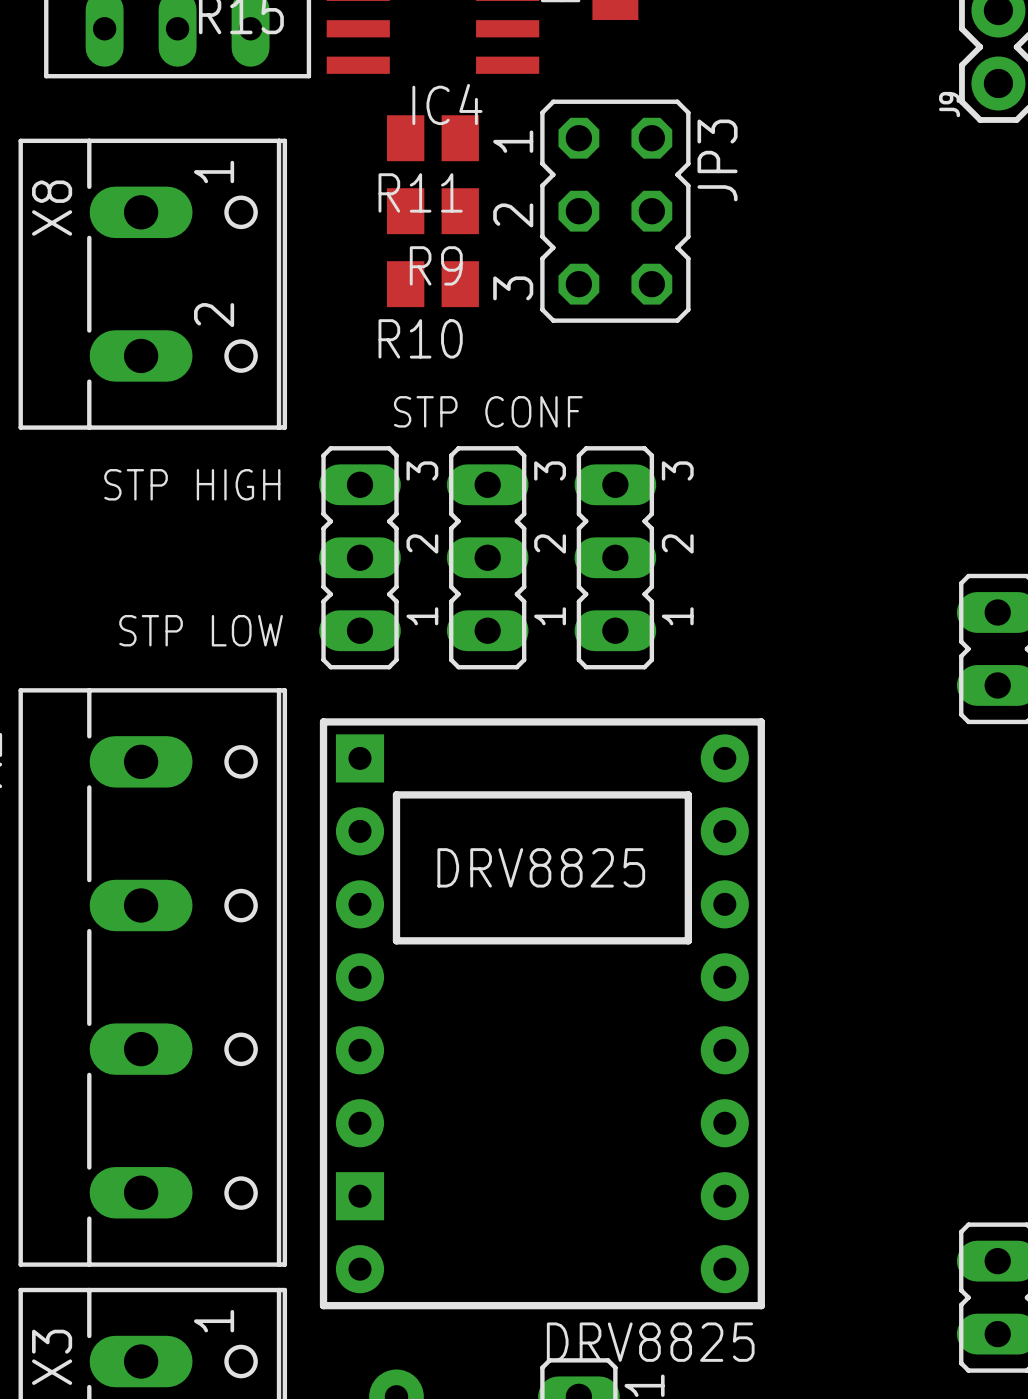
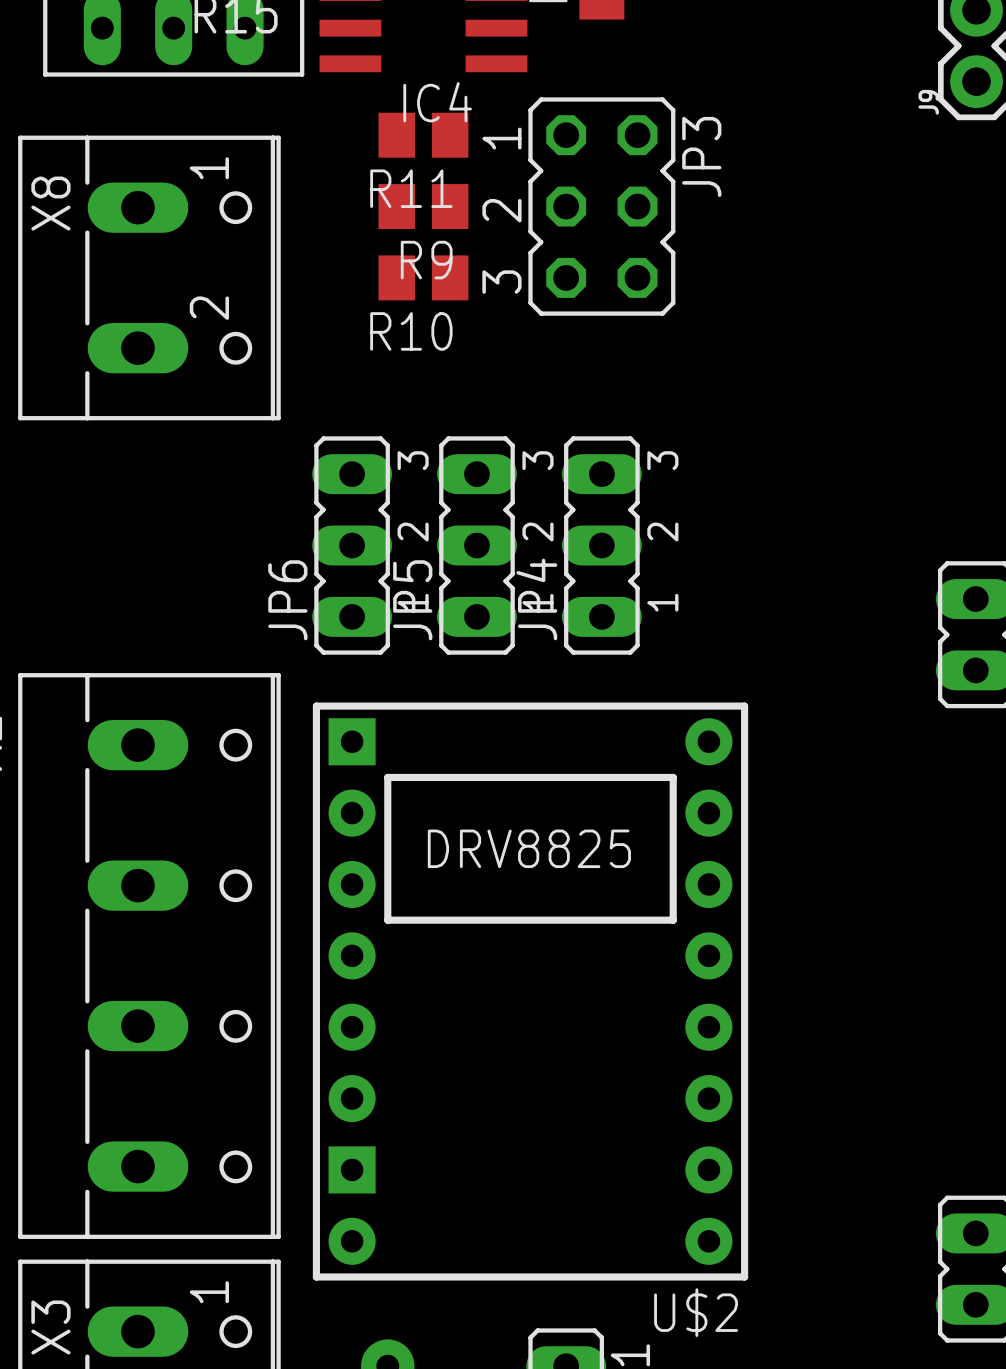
text: STP CONF (488, 411) -> none
text: STP HIGH (192, 484) -> none
JP4 name: none -> JP4 (536, 599)
JP6 name: none -> JP6 (287, 600)
JP5 name: none -> JP5 (412, 600)
text: STP LOW (201, 630) -> none
DRV8825 name: DRV8825 (650, 1342) -> U$2 (696, 1312)

